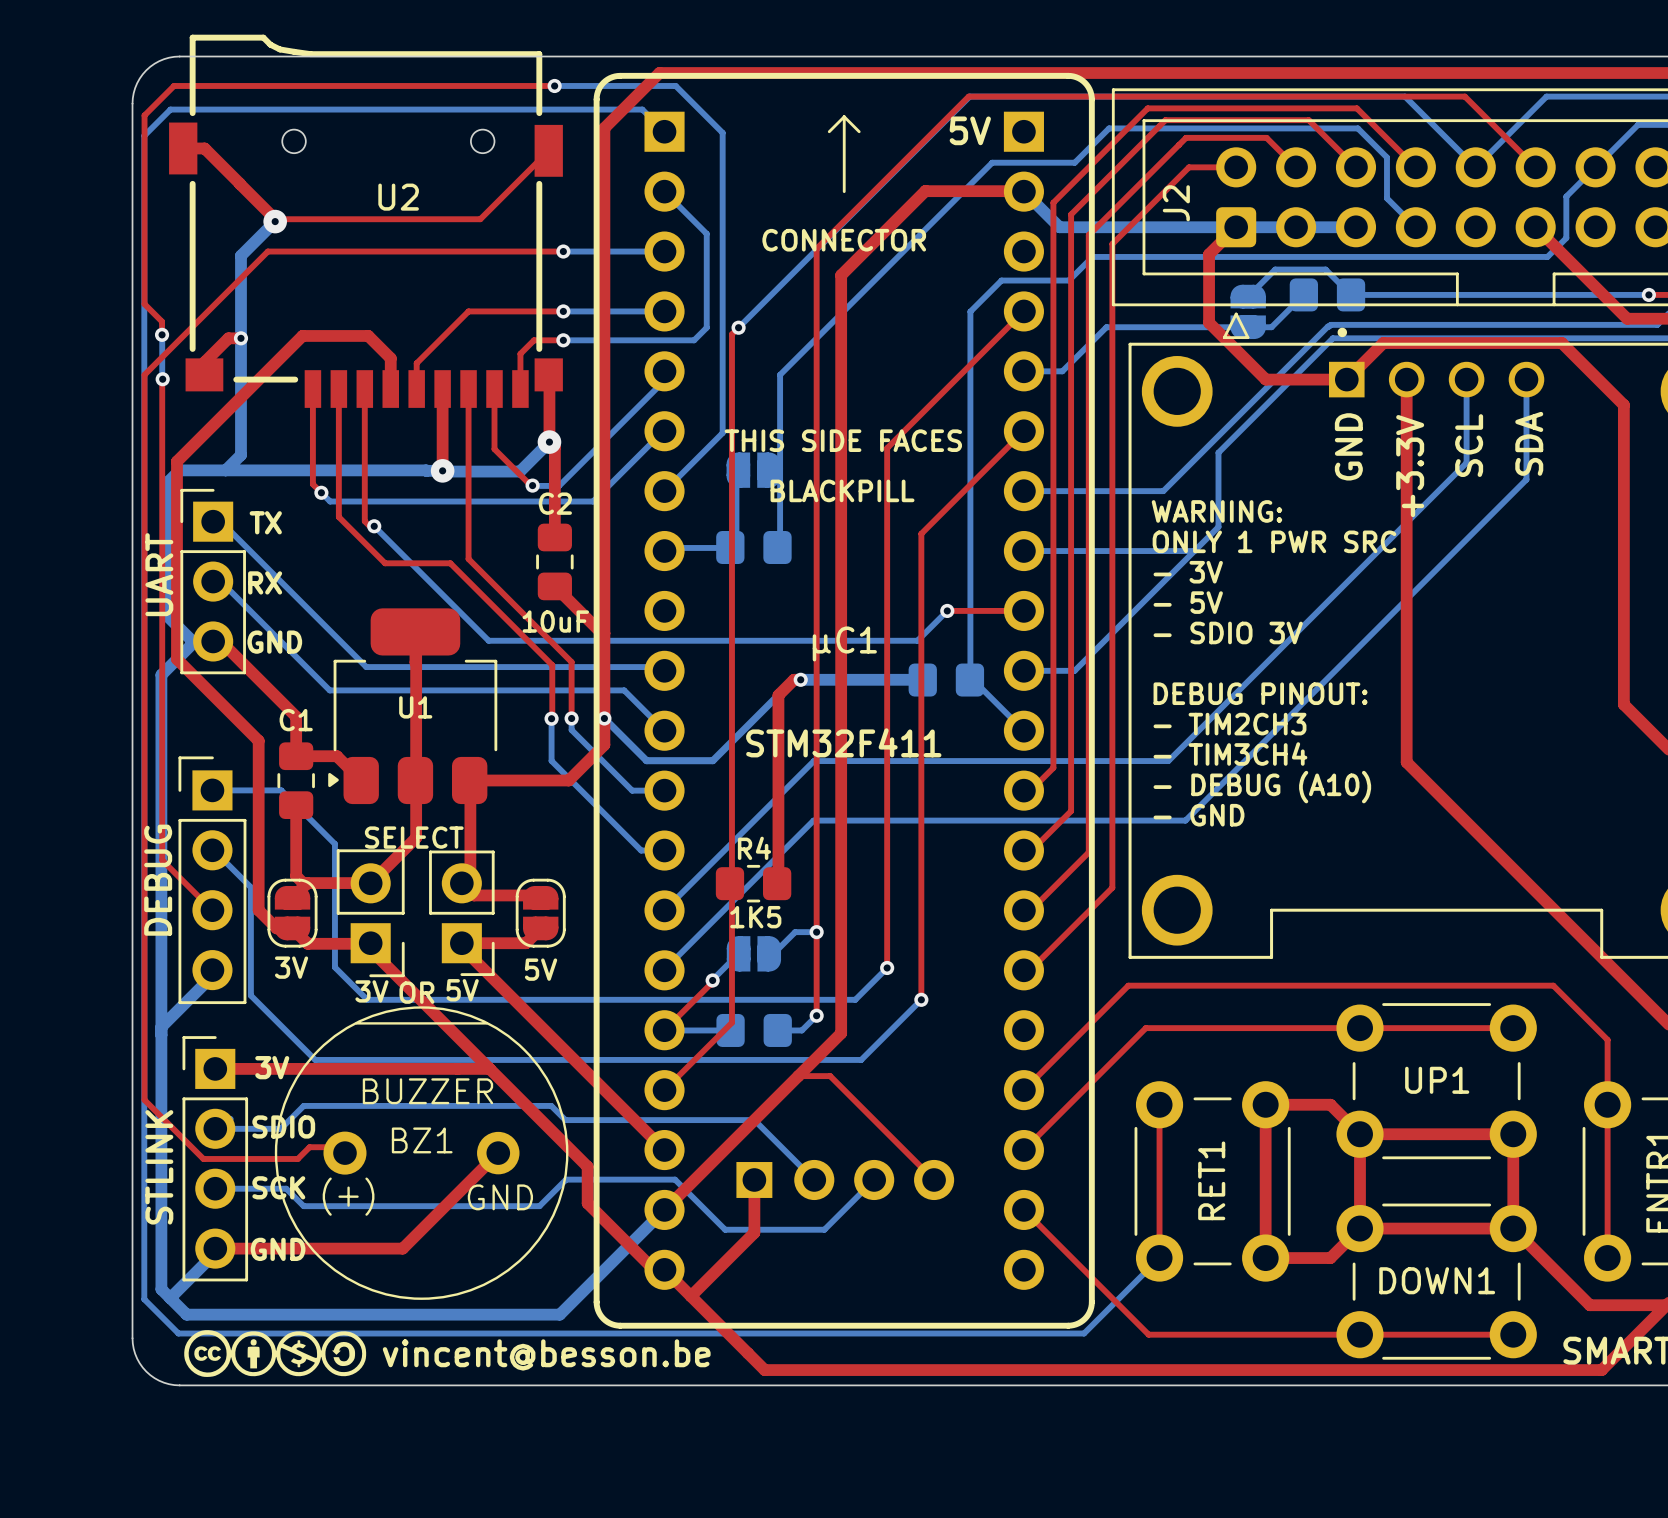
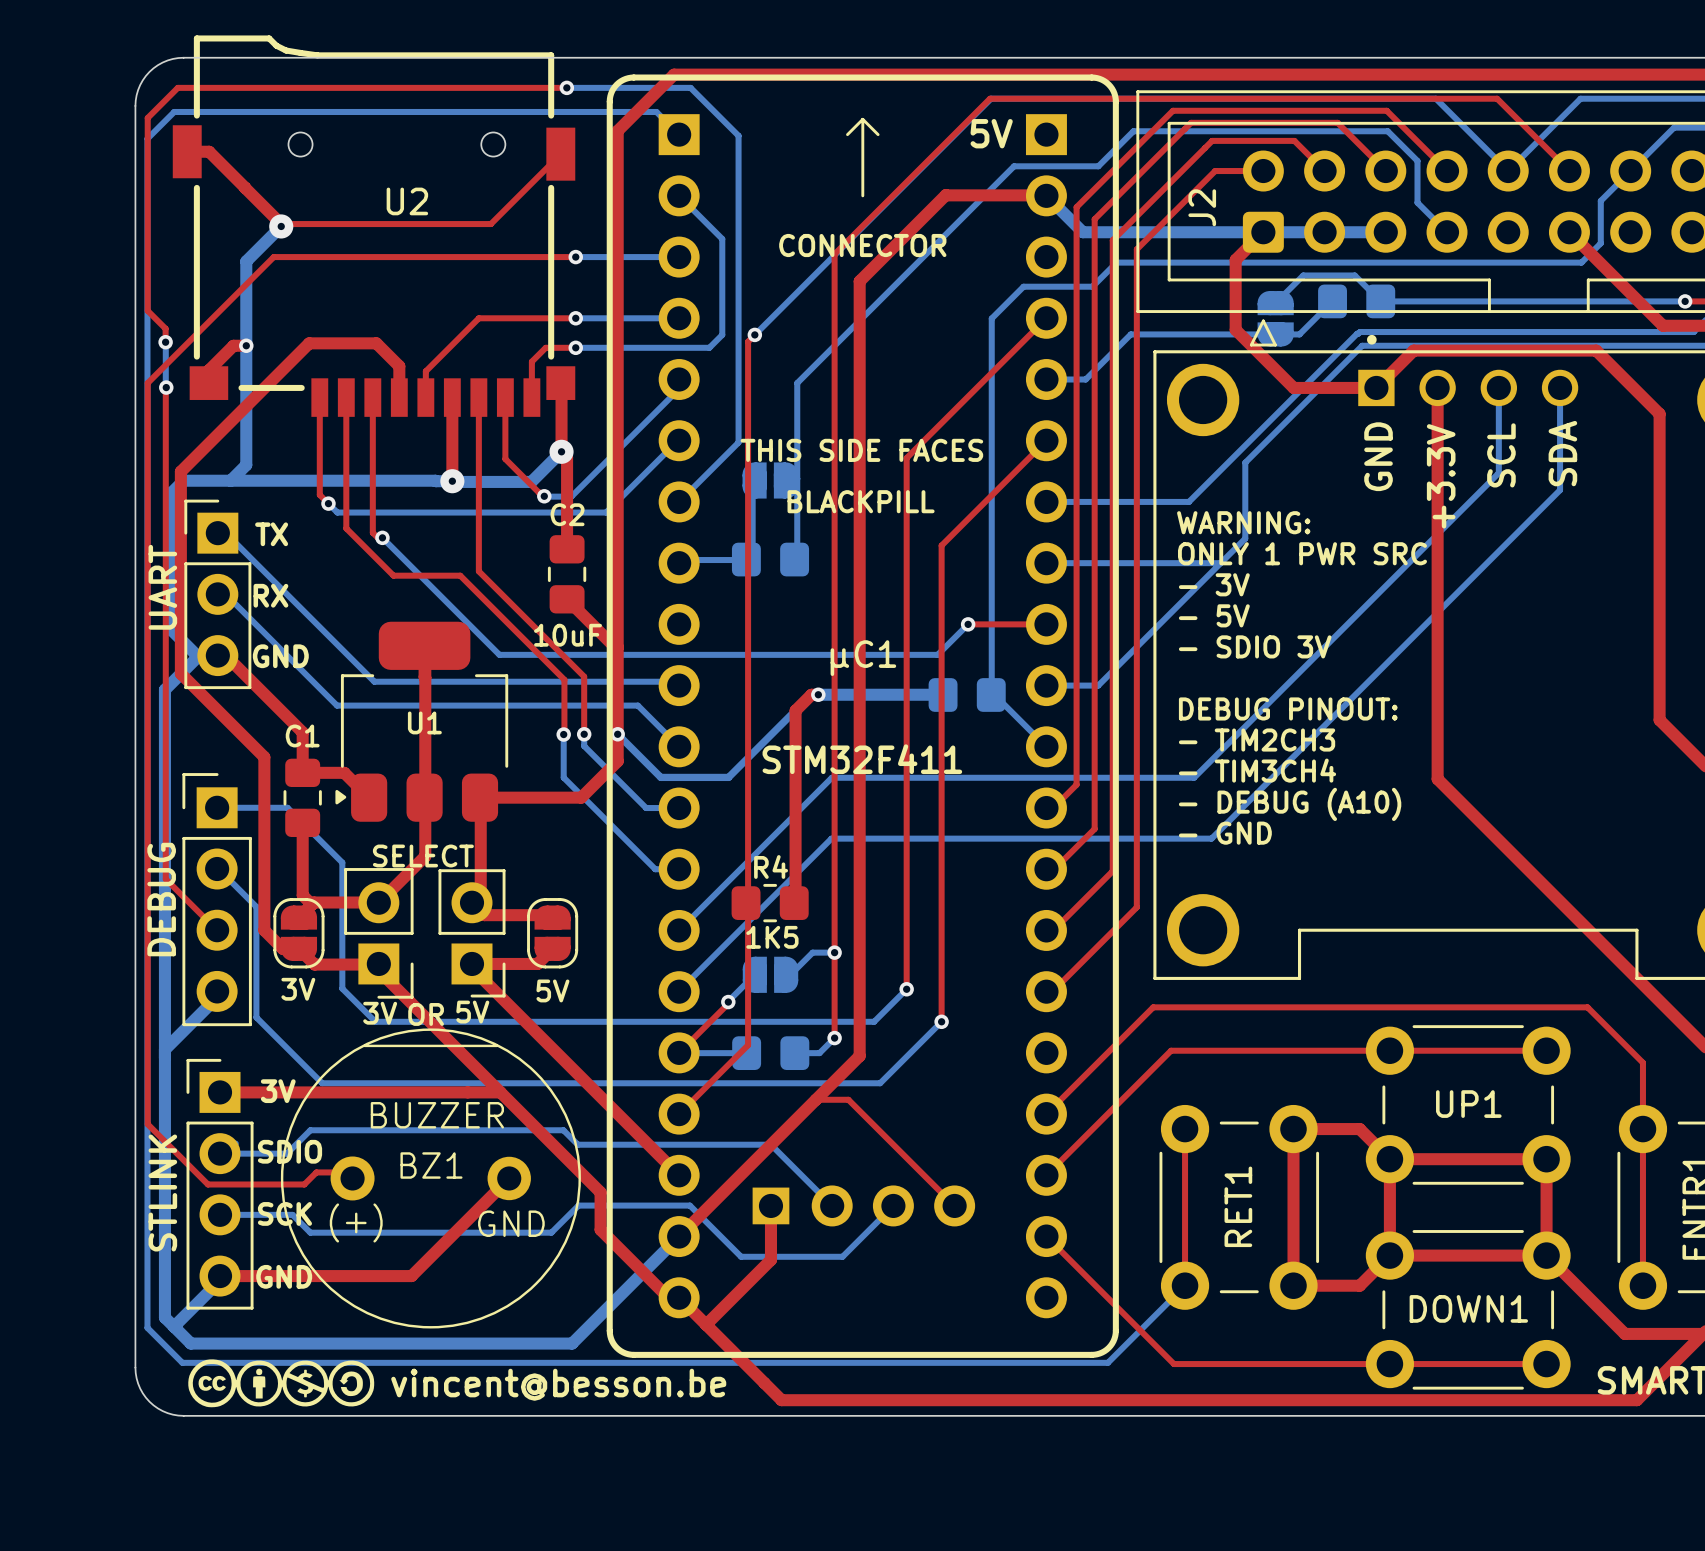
3V name: 3V (291, 967) -> none
text: none -> 3V (298, 989)

